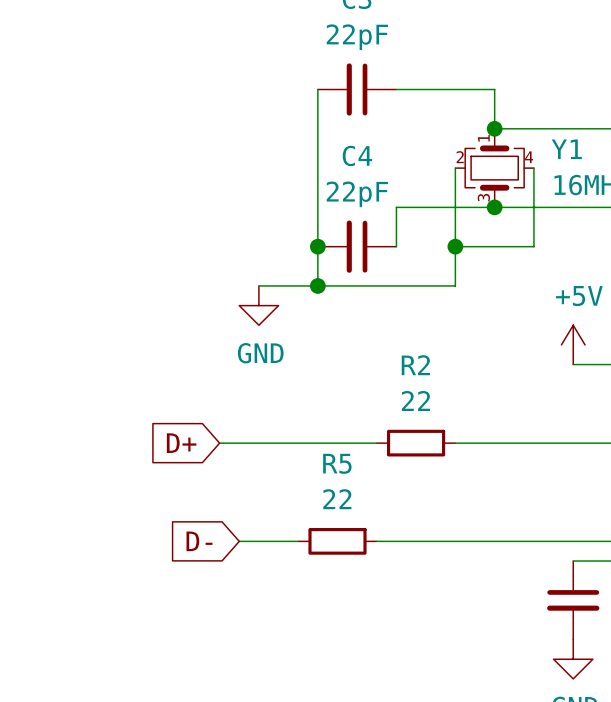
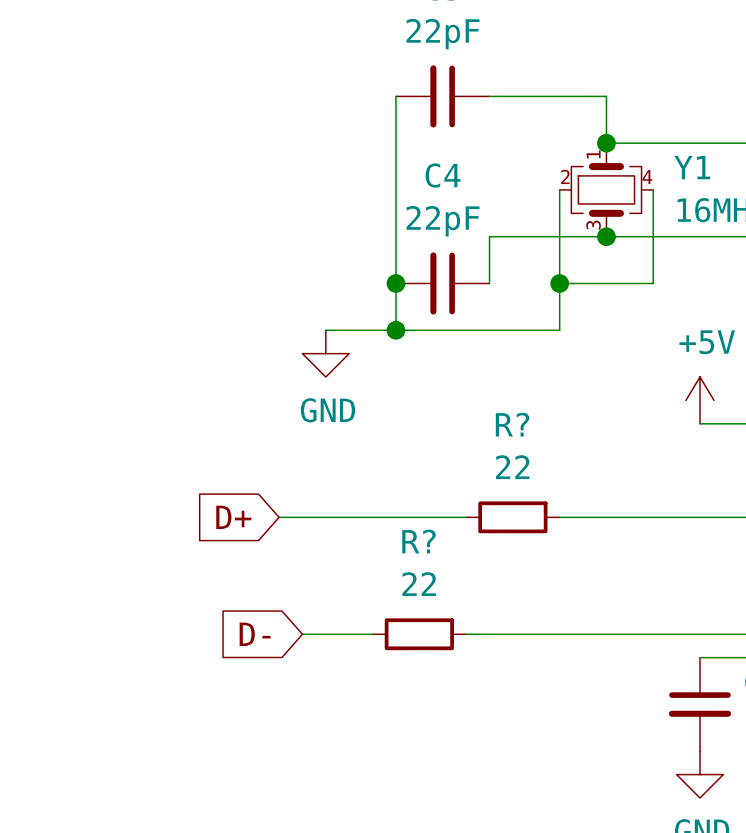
R2 name: R2 (415, 365) -> R? (512, 424)
R5 name: R5 (337, 463) -> R? (418, 541)

